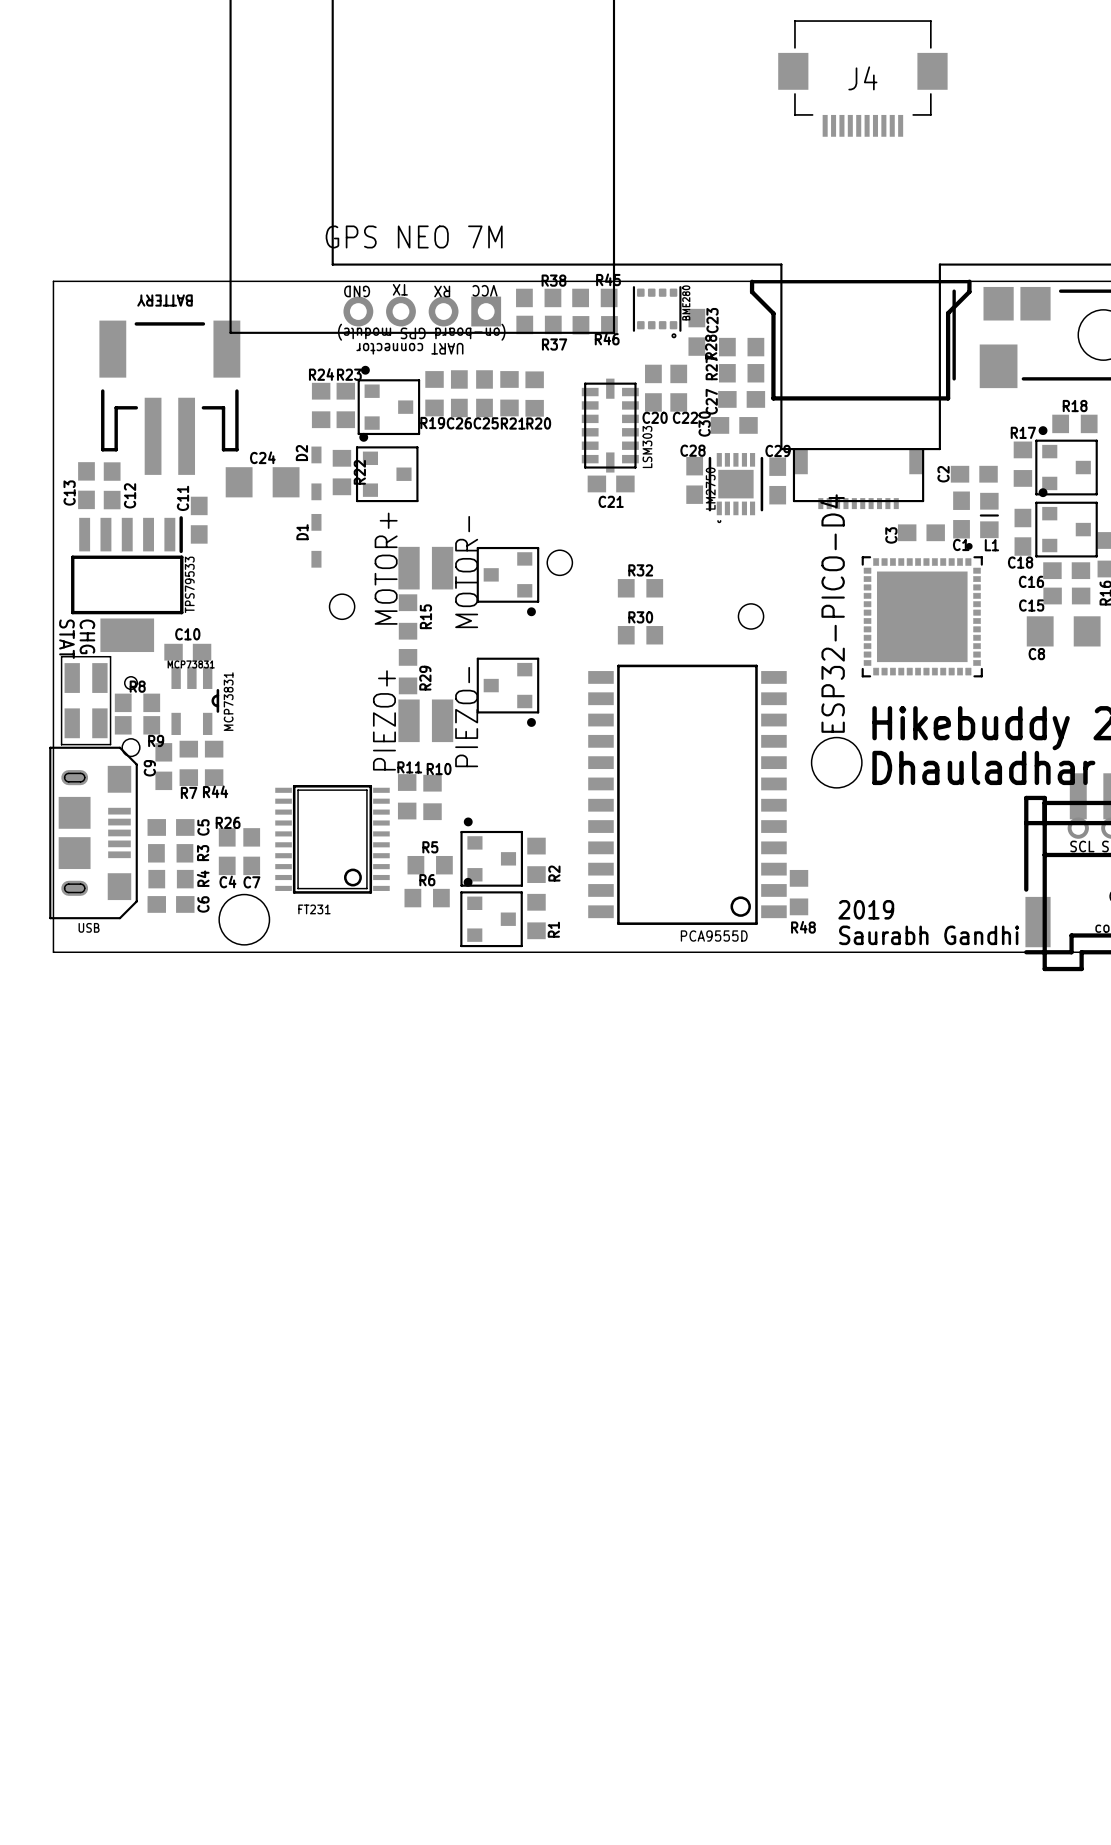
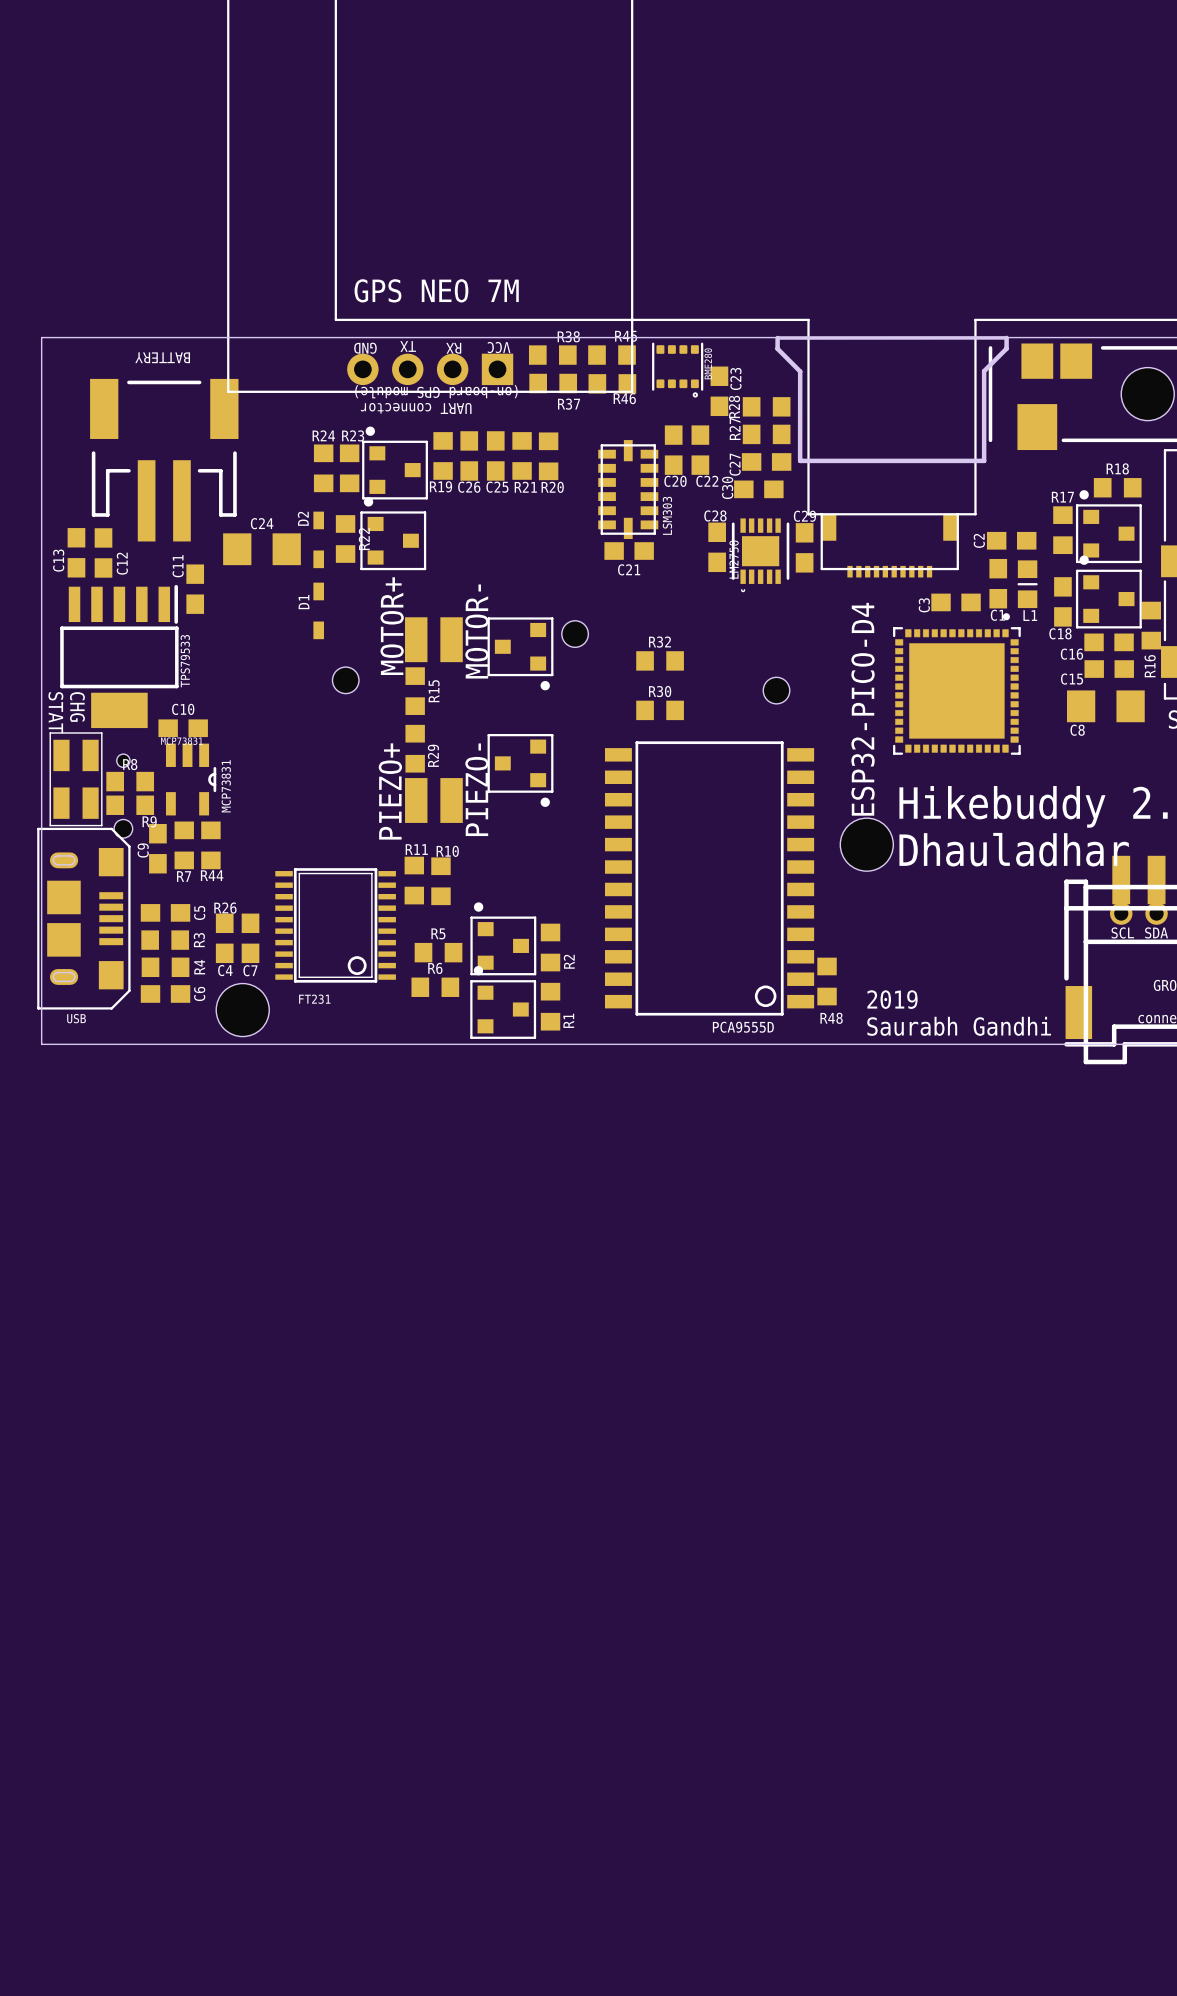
J4: (862, 78) -> none

